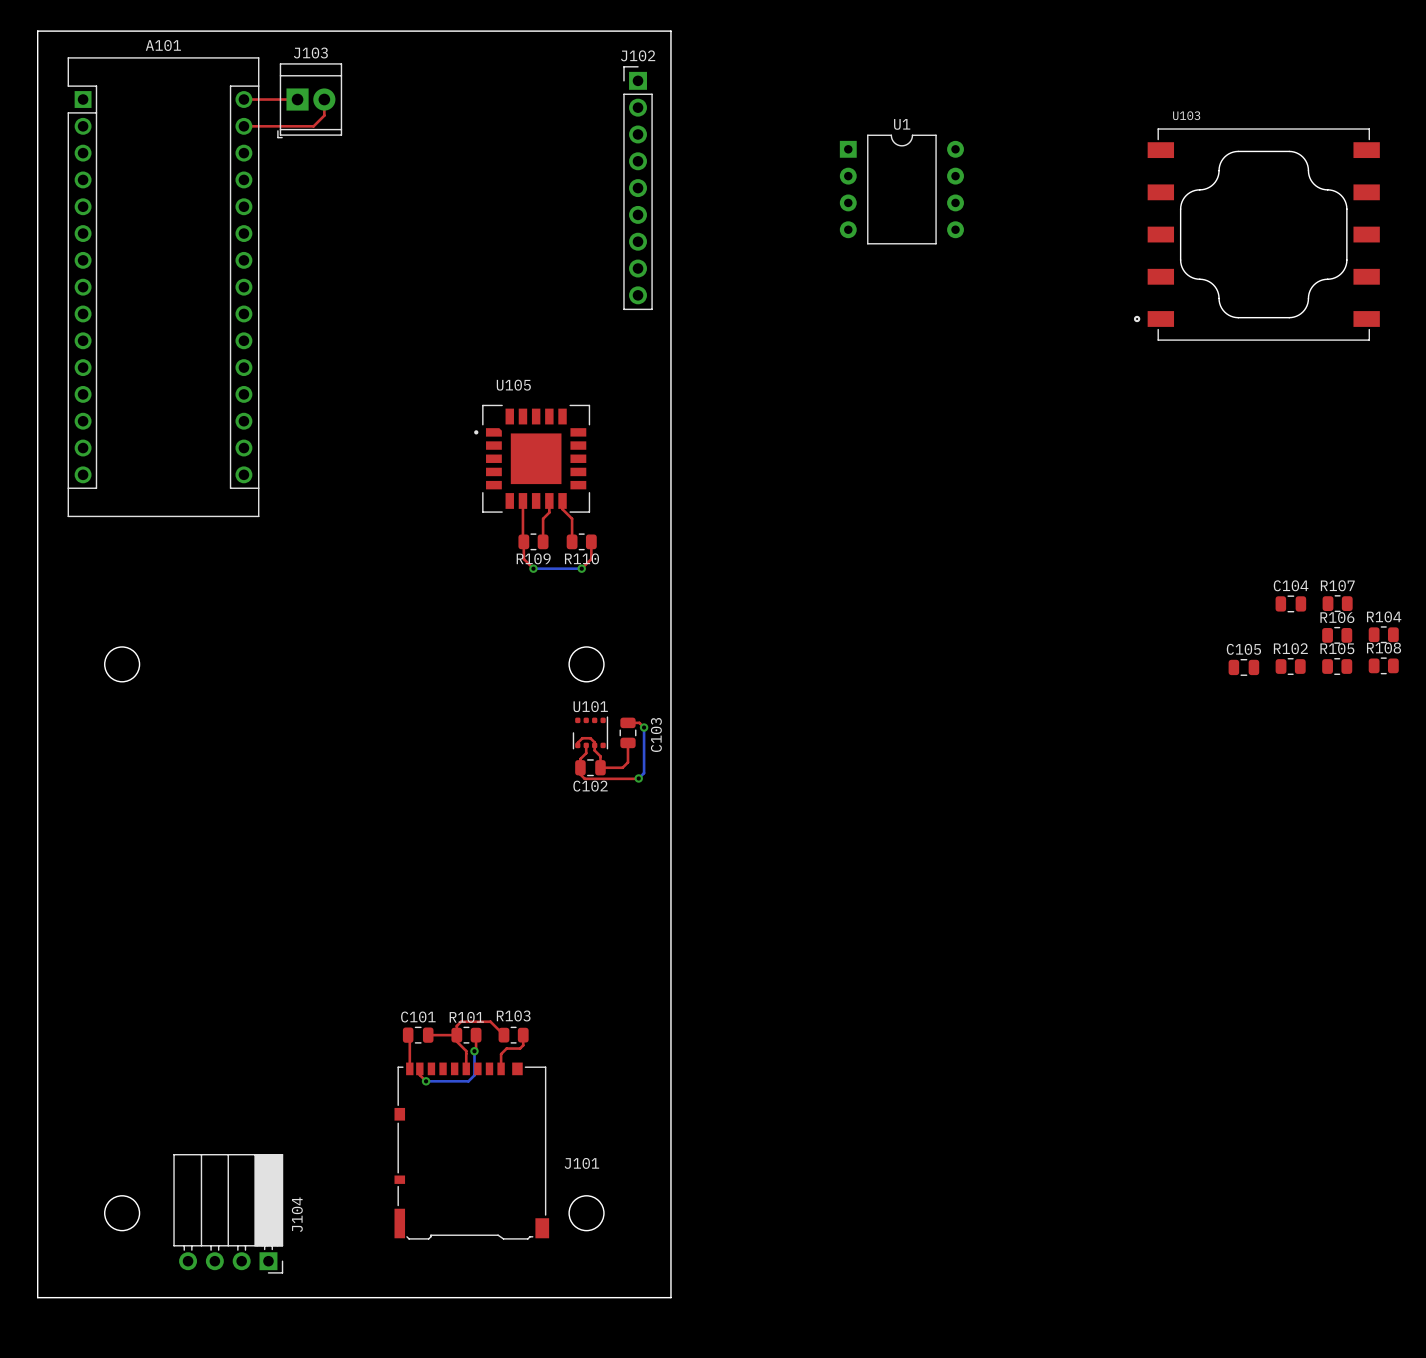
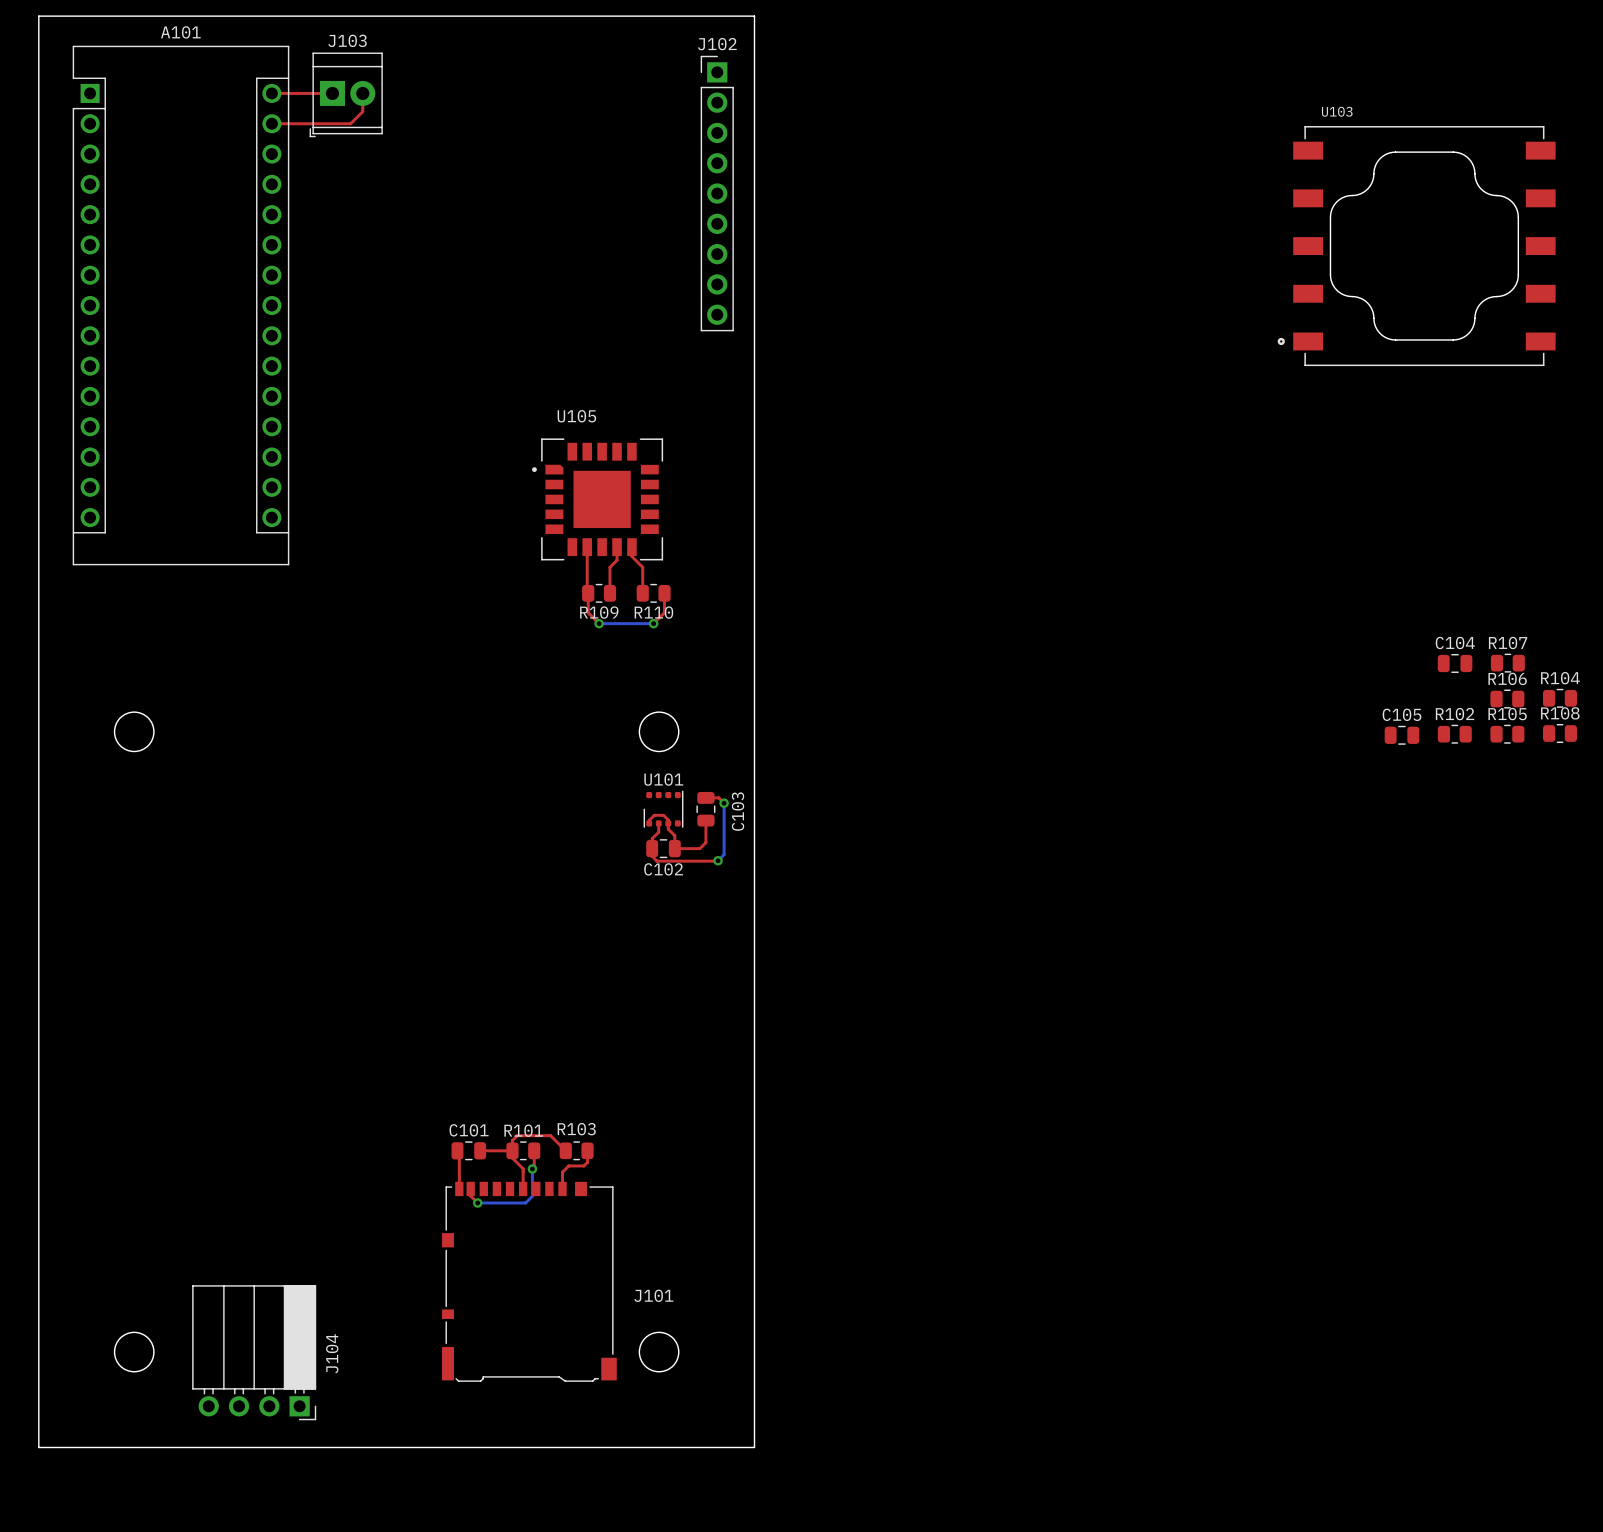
U1: (901, 189) -> none

